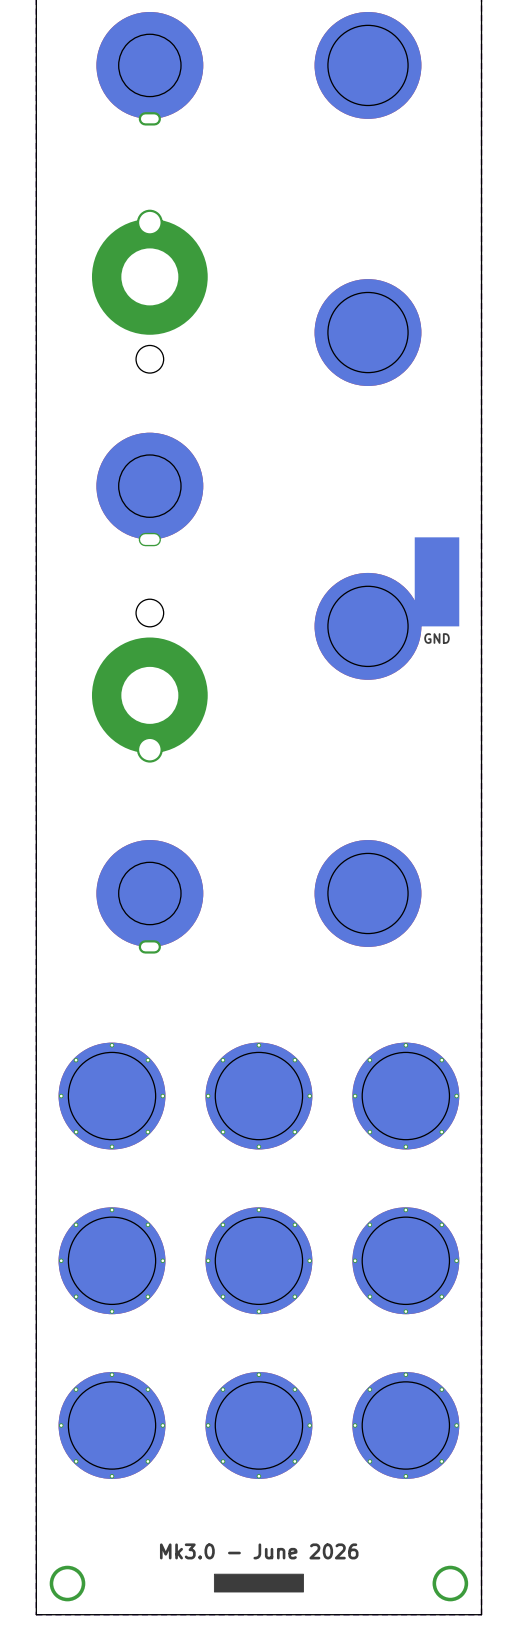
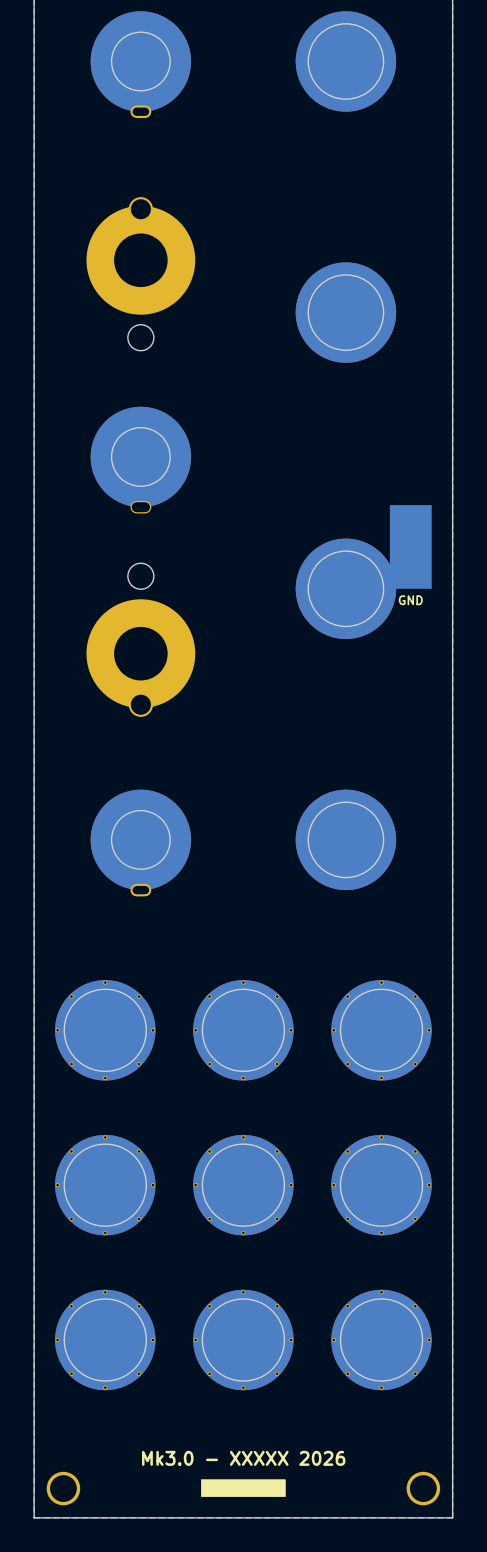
text: Mk3.0 - June 2026 (259, 1551) -> Mk3.0 - XXXXX 2026 (243, 1458)

